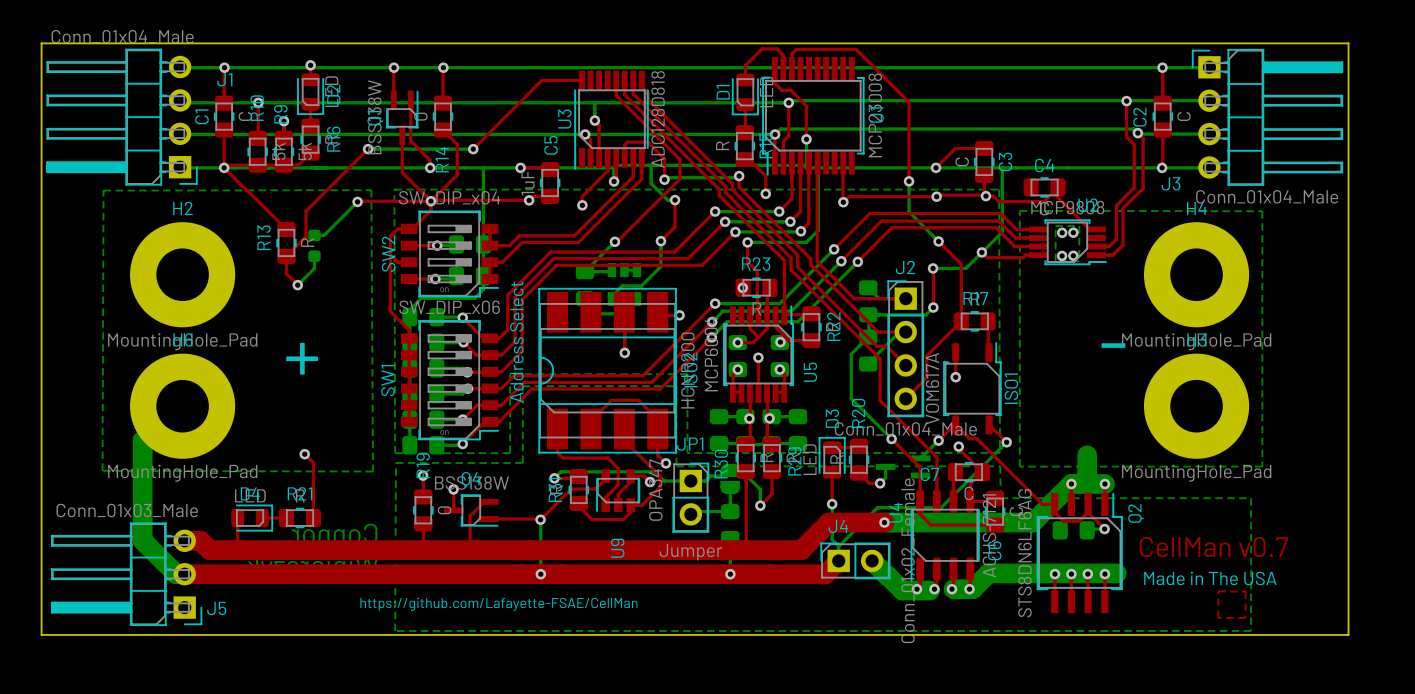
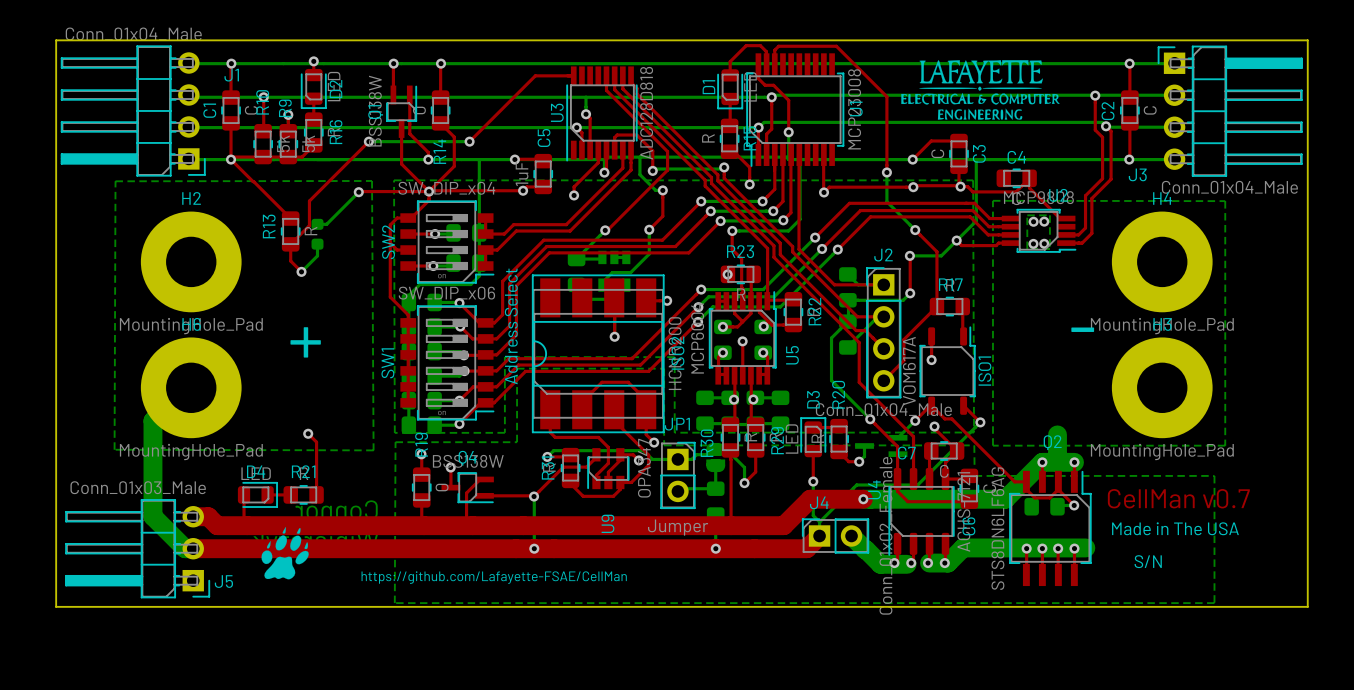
drawing: none -> [901, 60, 1060, 120]
Q2 name rotation: 0° (1135, 513) -> 90° clockwise (1052, 442)
Q2 name position: Q2 (1135, 513) -> Q2 (1052, 442)
text: none -> CellMan v0.7 (1178, 498)
text: CellMan v0.7 (1213, 547) -> Made in The USA (1175, 528)
drawing: none -> [261, 526, 309, 580]
text: Made in The USA (1210, 578) -> none
text: none -> S/N (1148, 561)
top zone outline: (1218, 591) (1245, 591) (1245, 617) (1218, 617) (1218, 591) -> none

